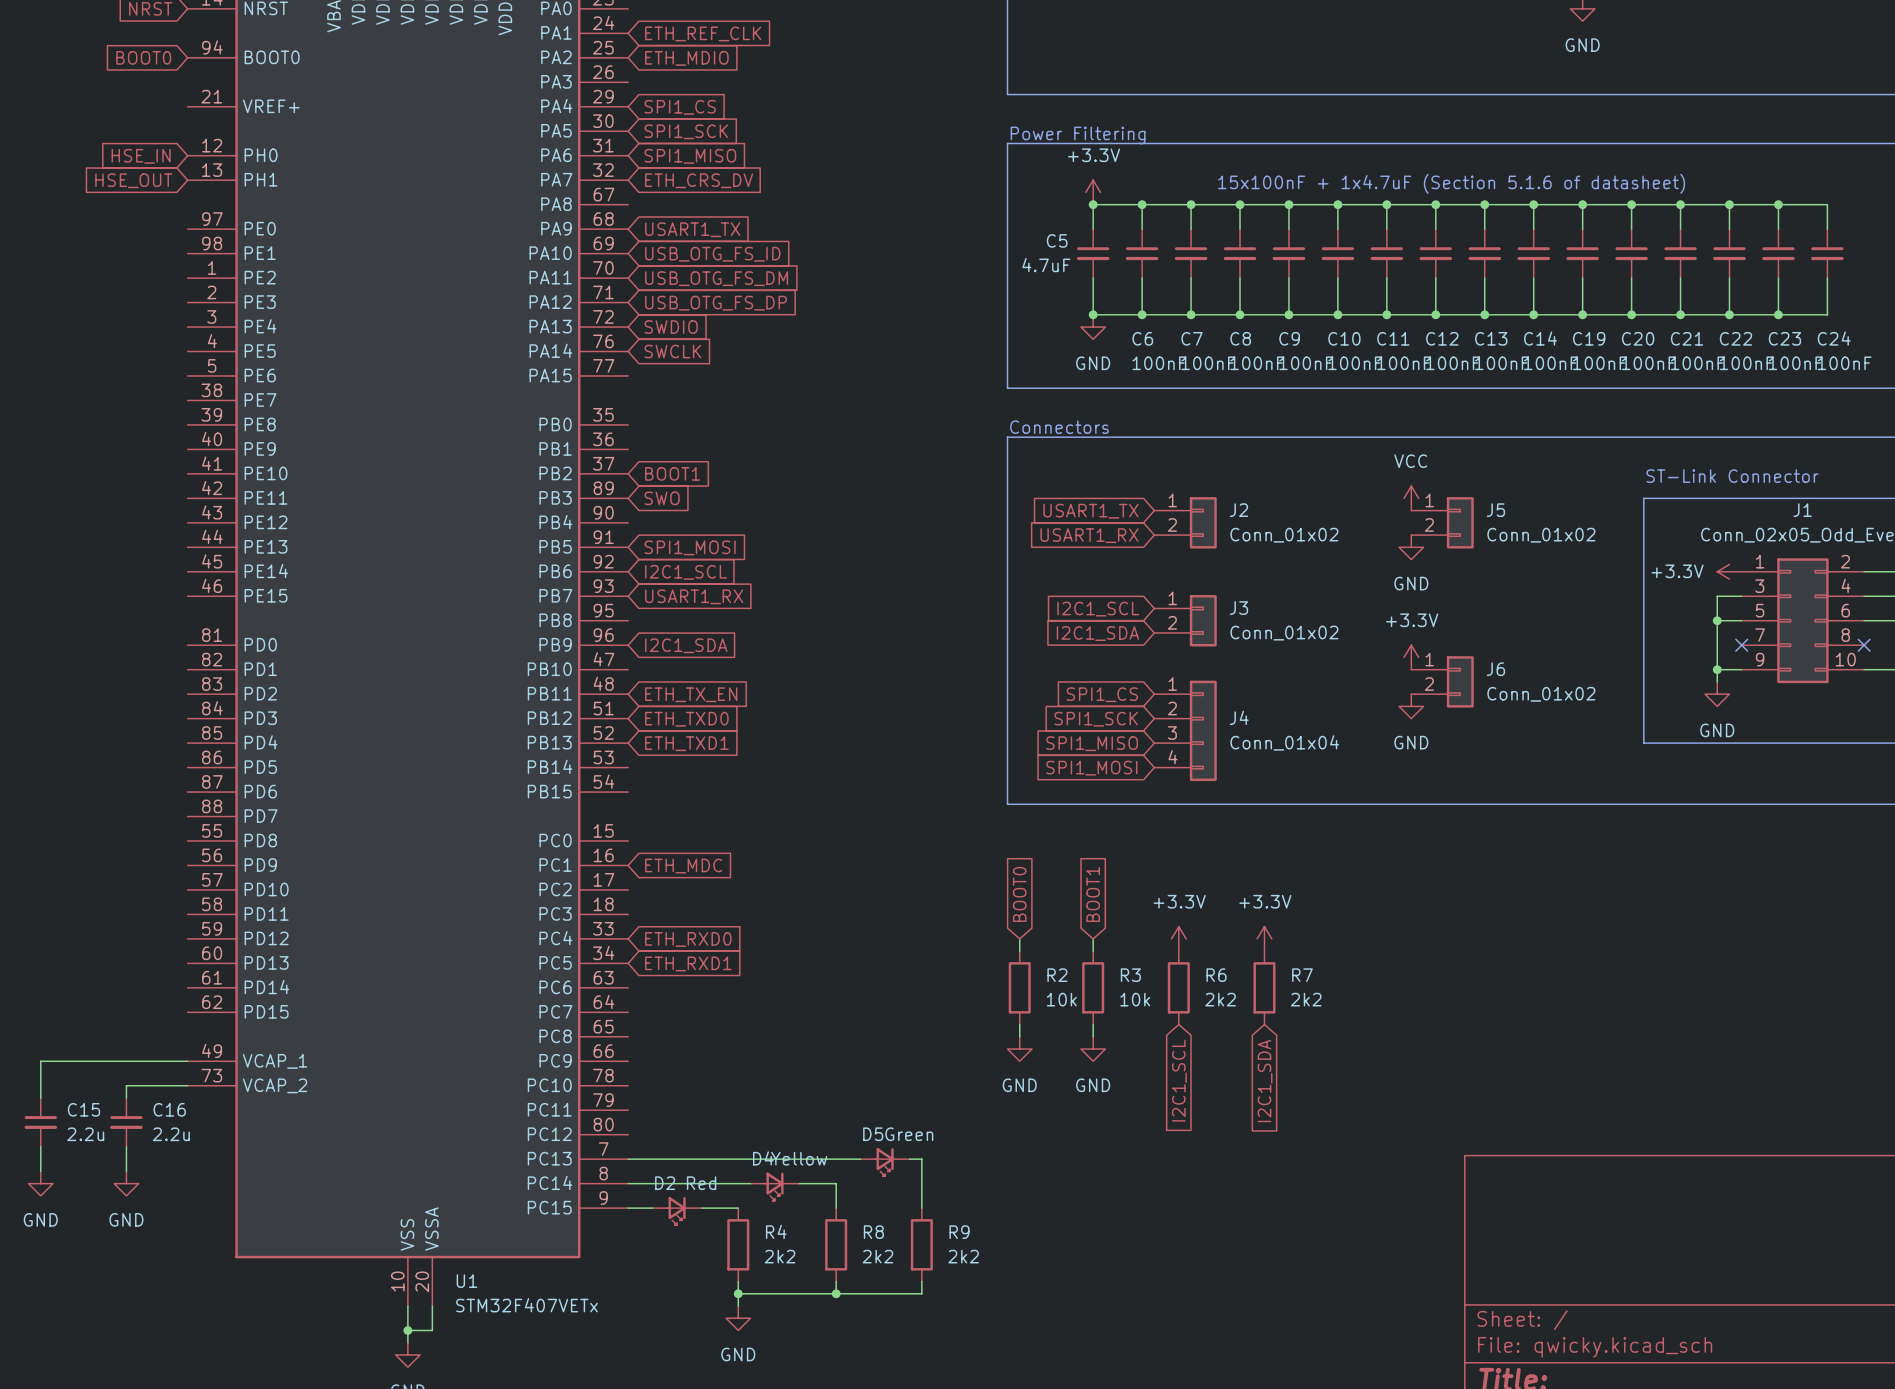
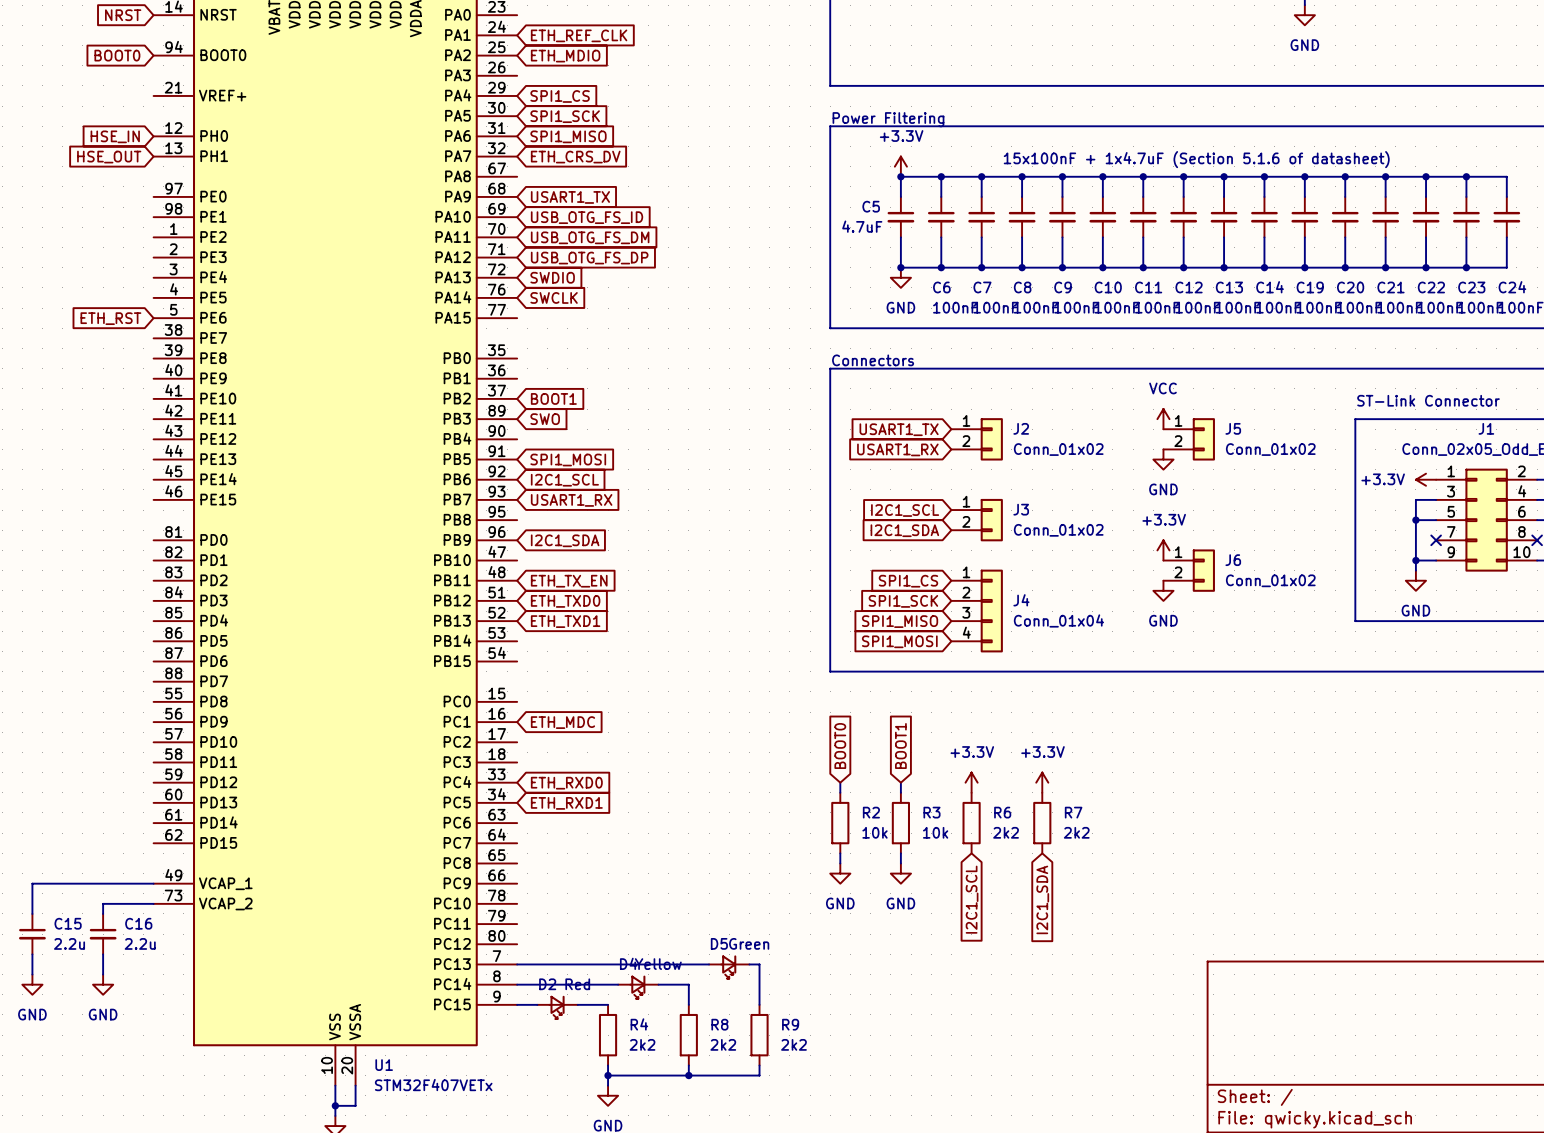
global label: none -> ETH_RST (110, 318)

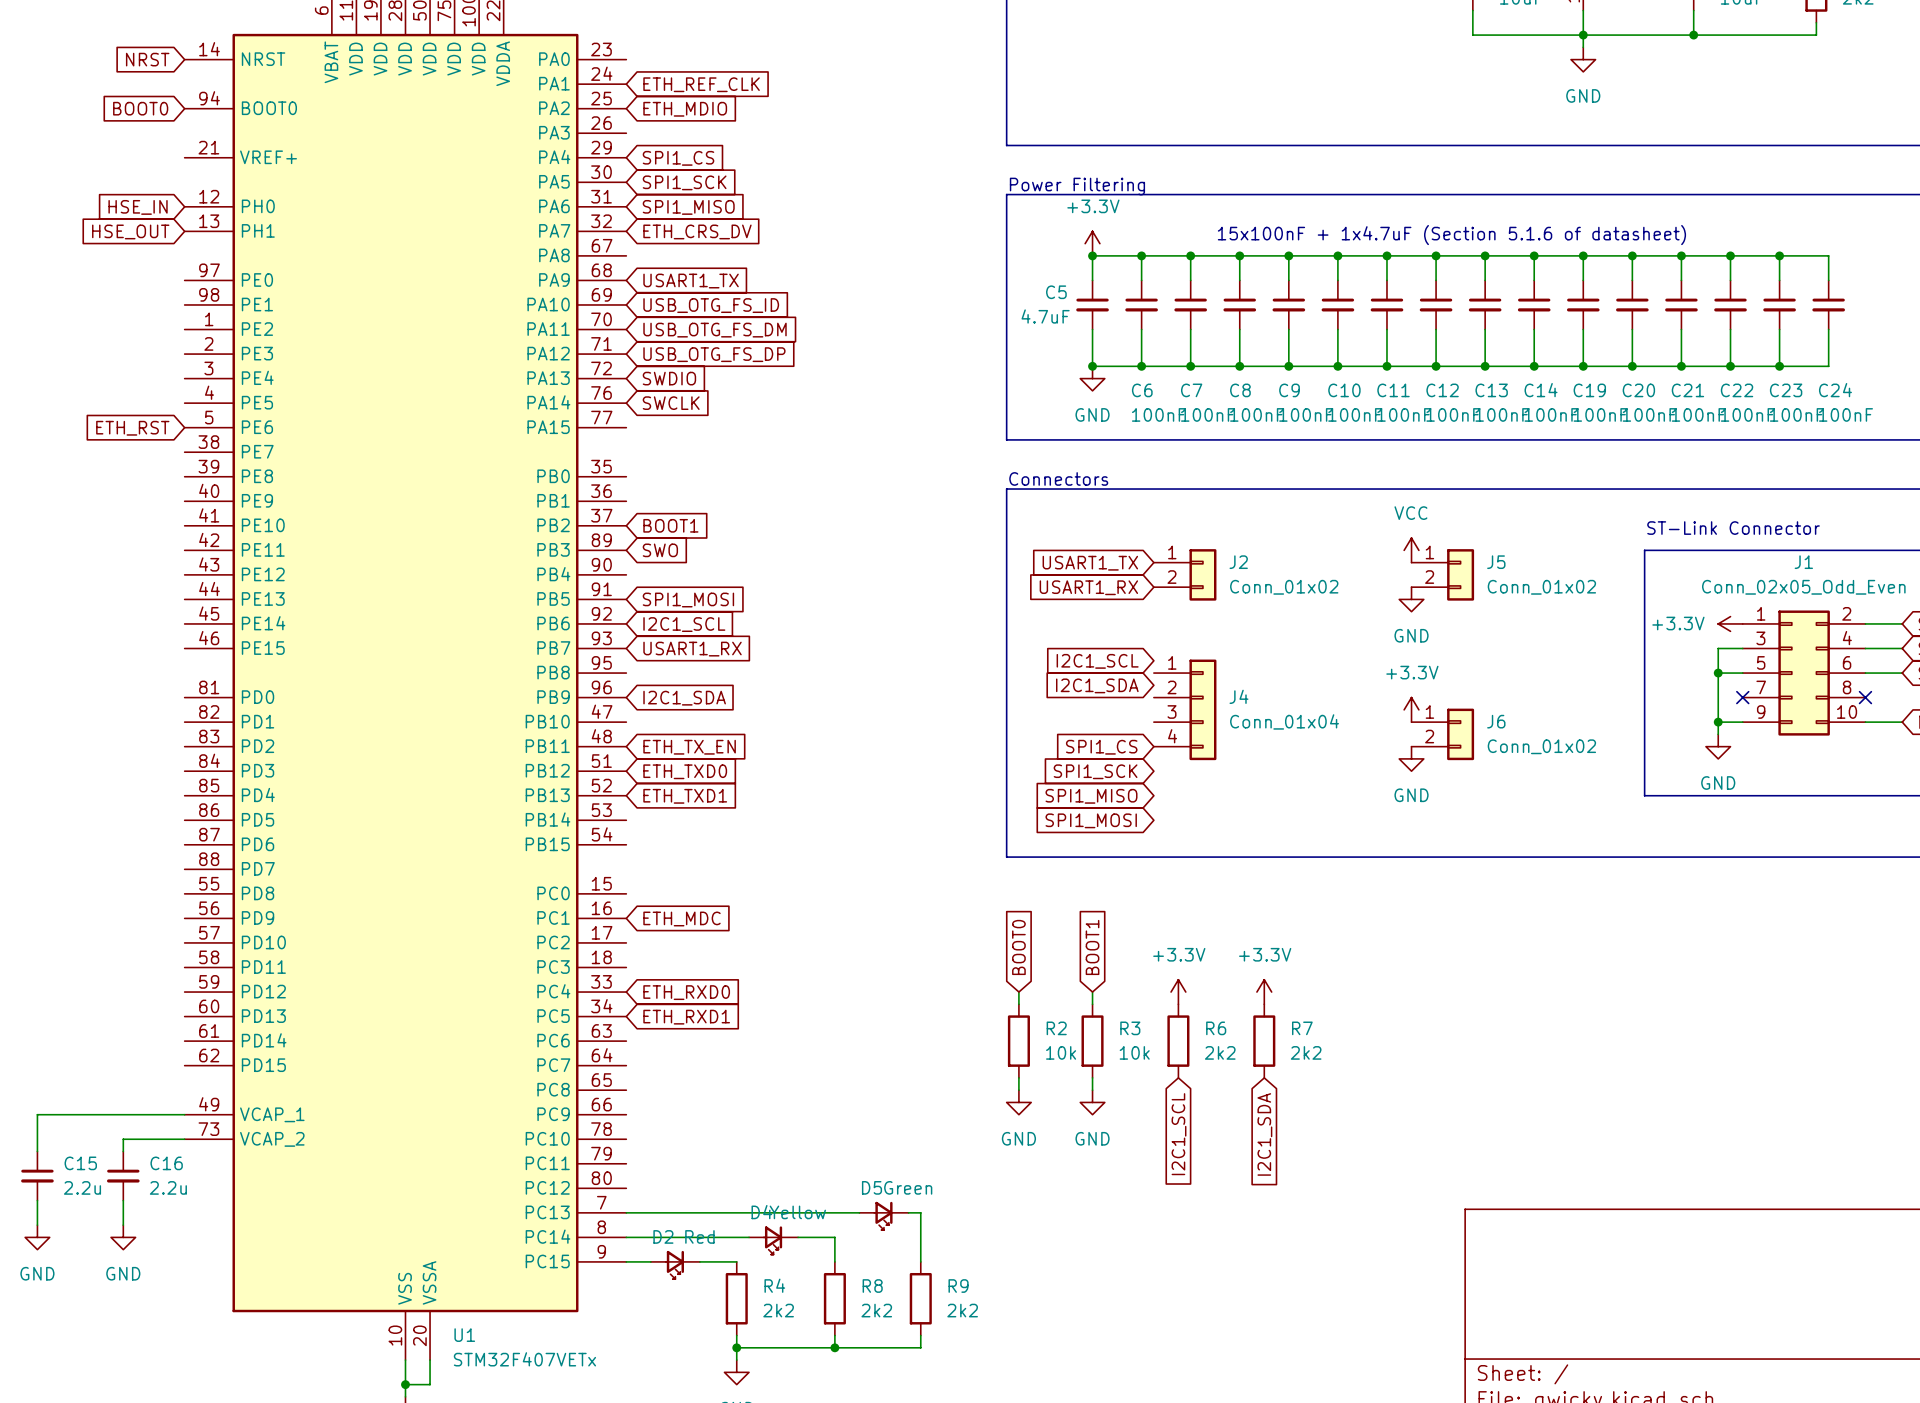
J3: Conn_01x02 (977, 520) -> none
J4 position: (977, 611) -> (1185, 709)

